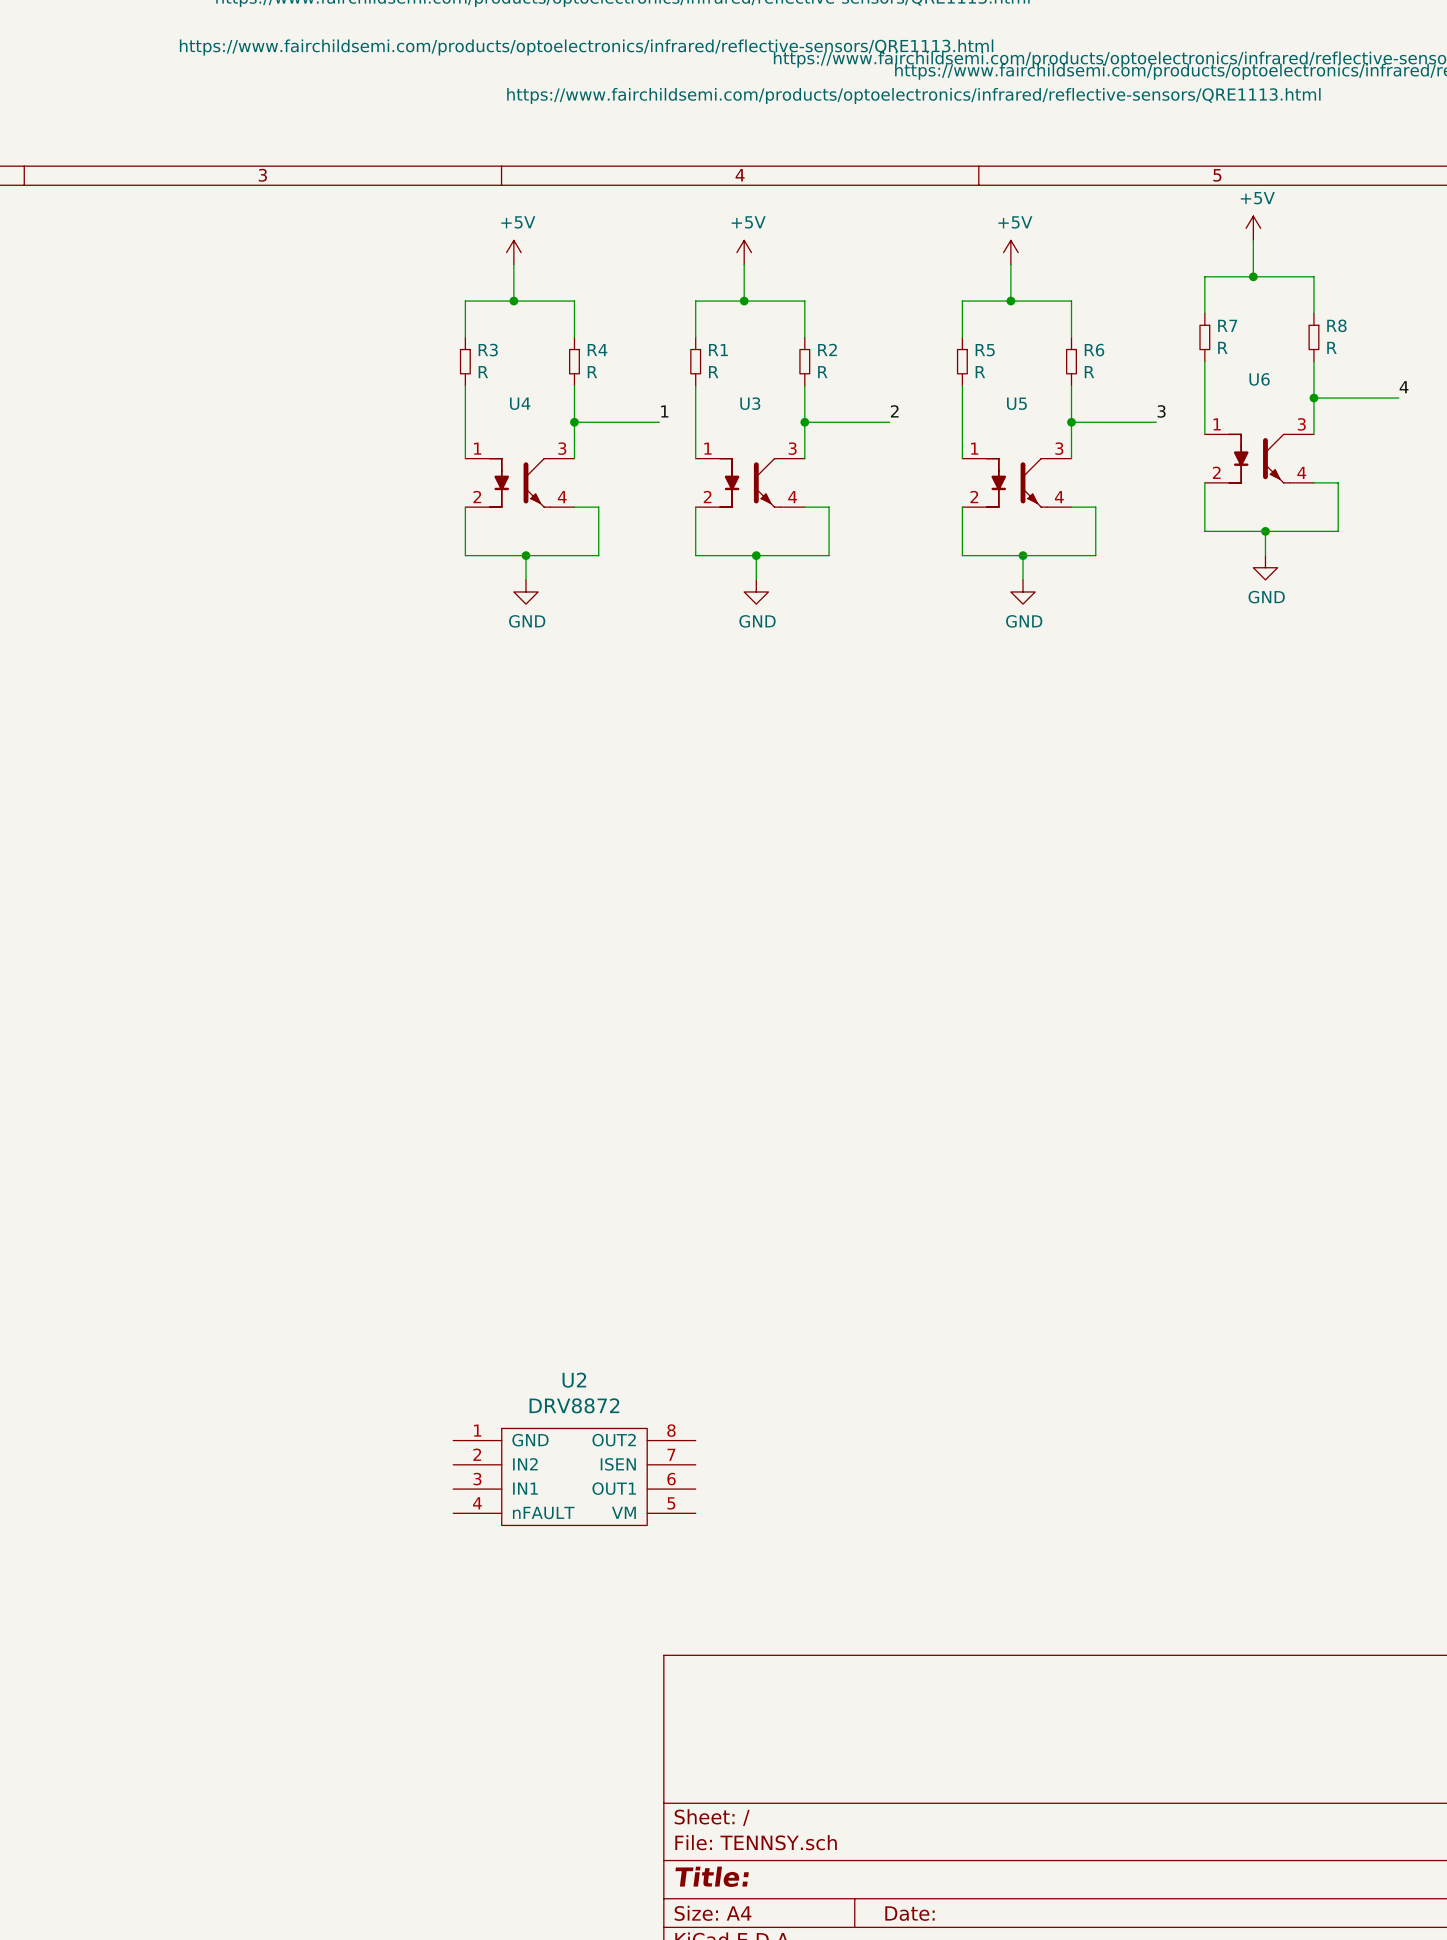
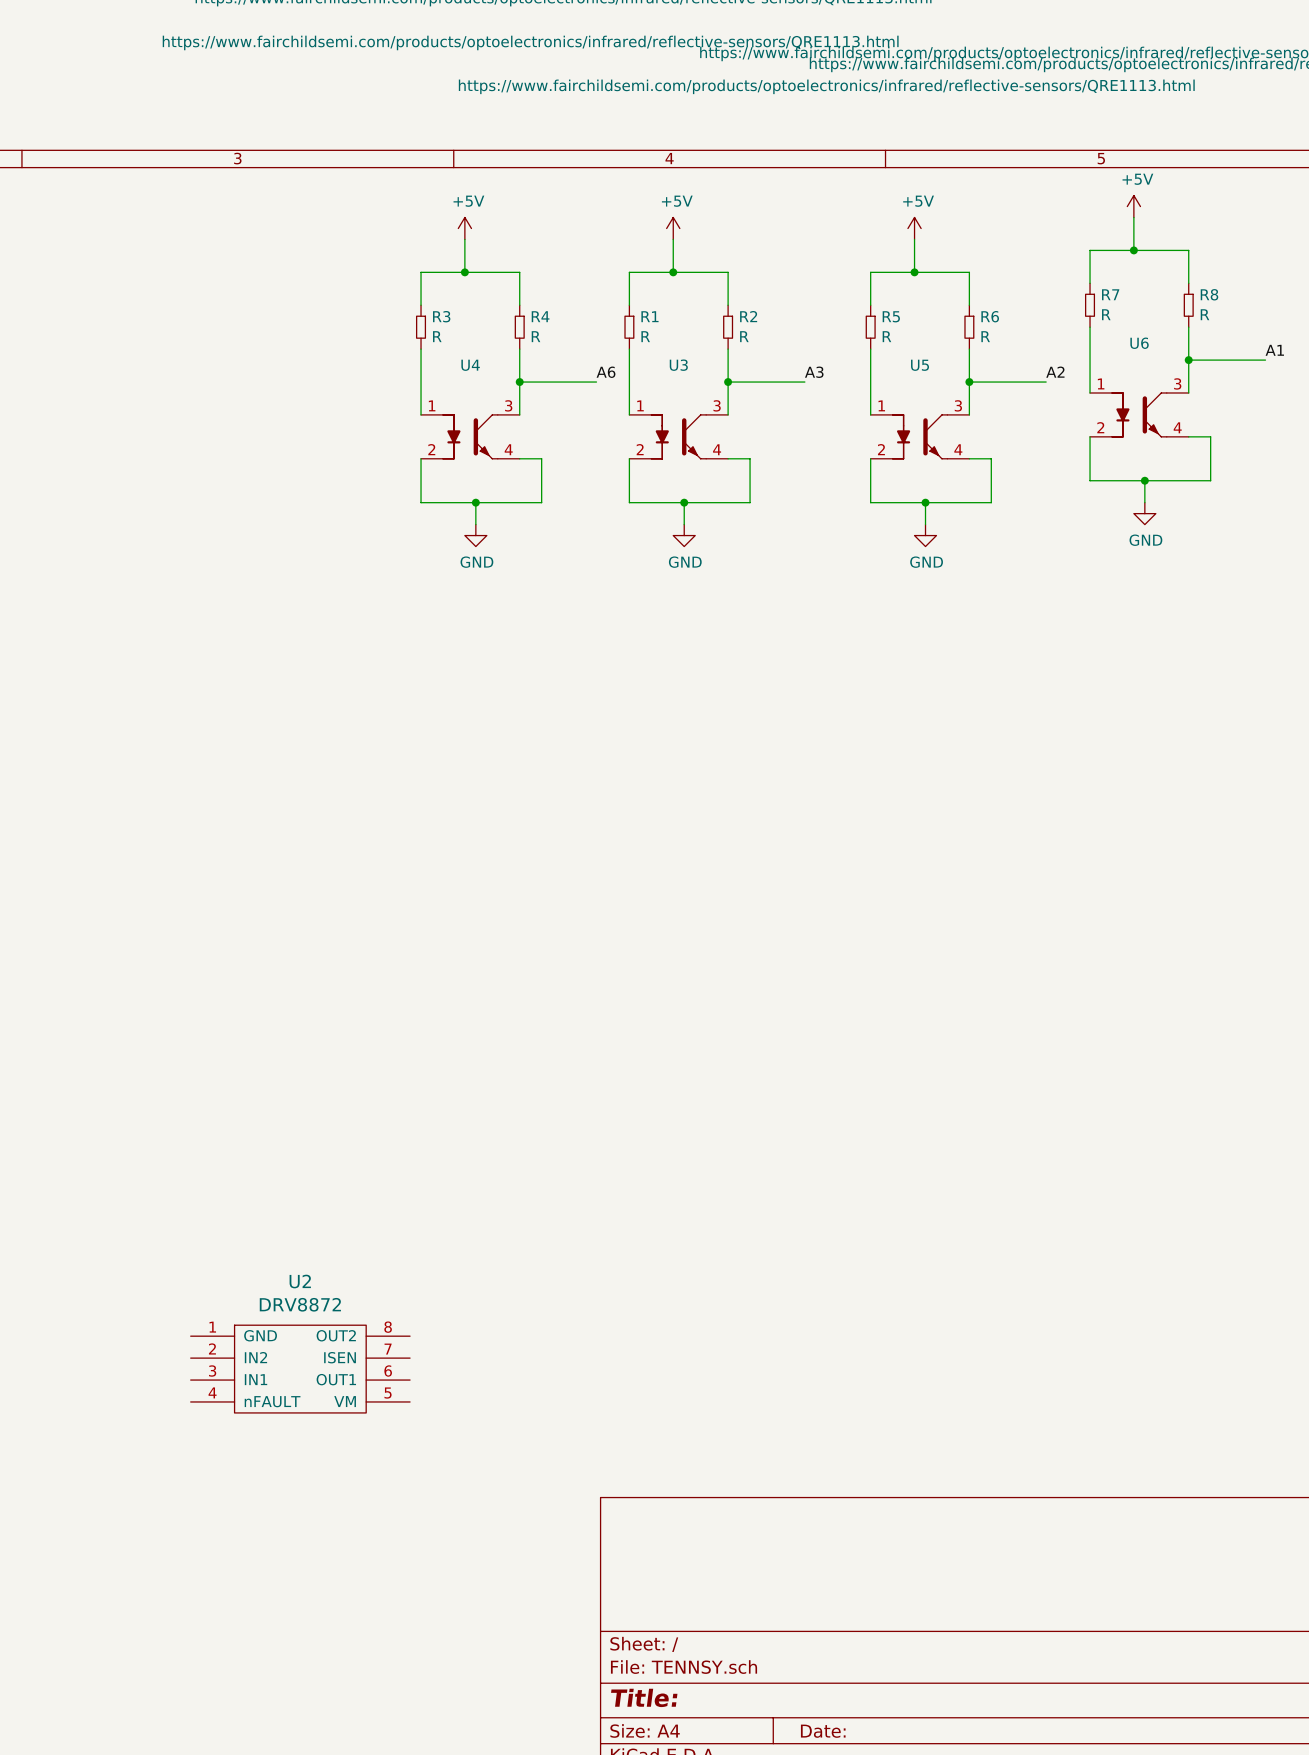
label: 4 (1404, 387) -> A1 (1274, 350)
label: 1 (664, 411) -> A6 (606, 372)
label: 2 (894, 411) -> A3 (814, 372)
label: 3 (1161, 411) -> A2 (1055, 372)
U2 position: (574, 1476) -> (300, 1369)

